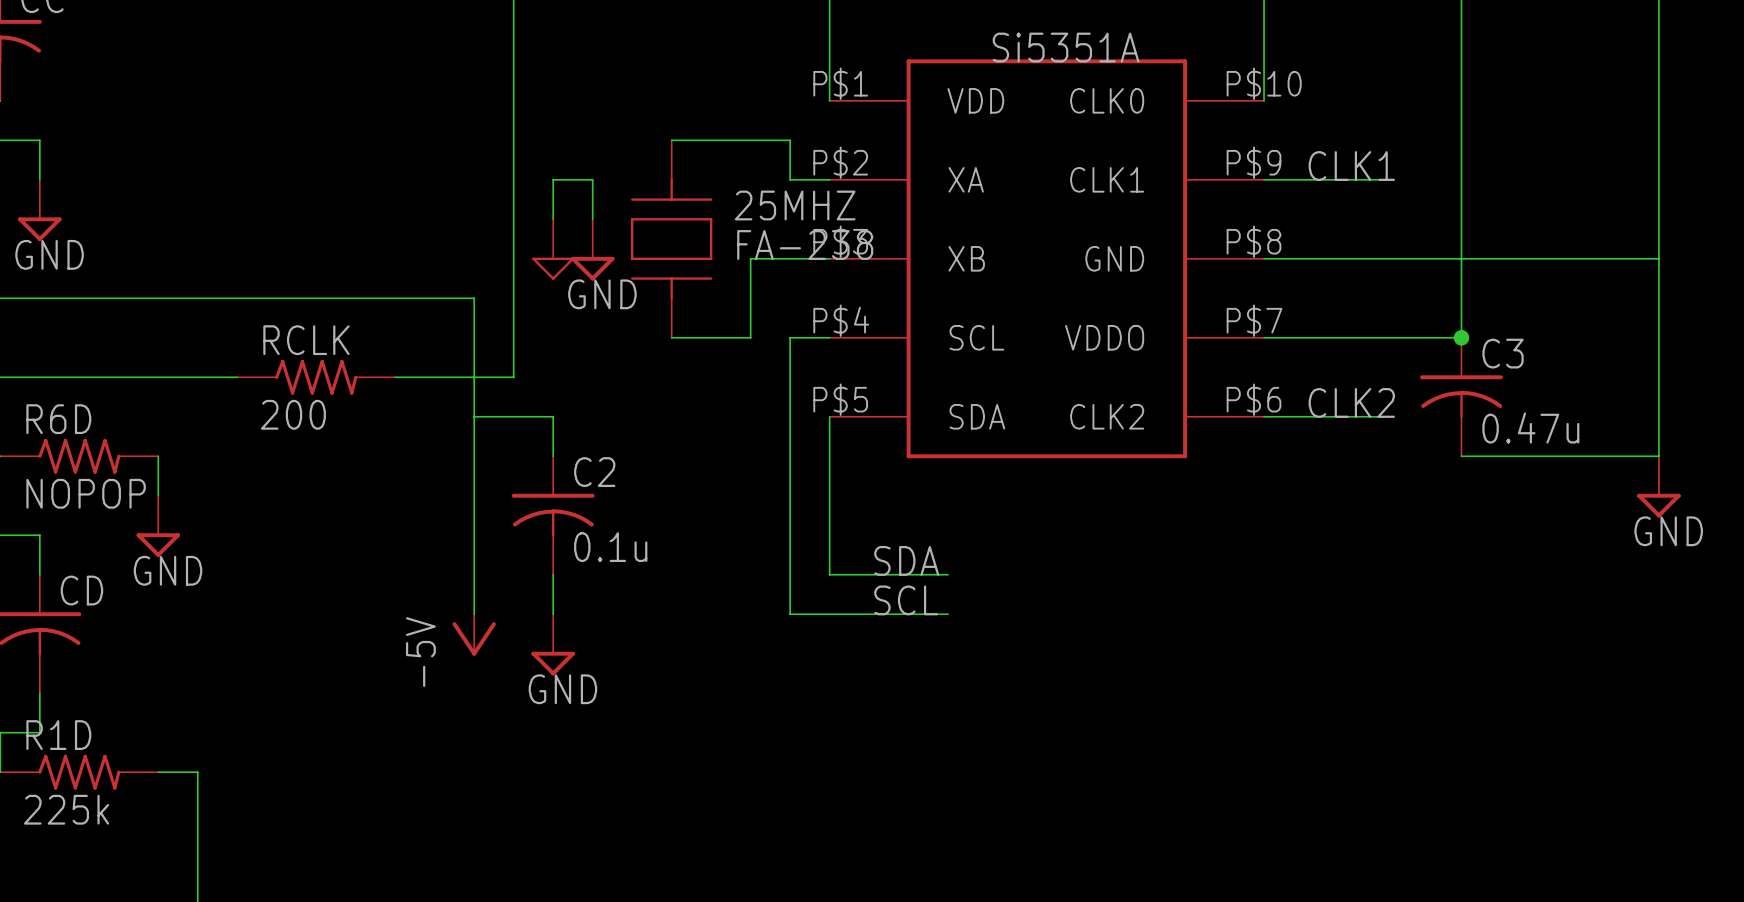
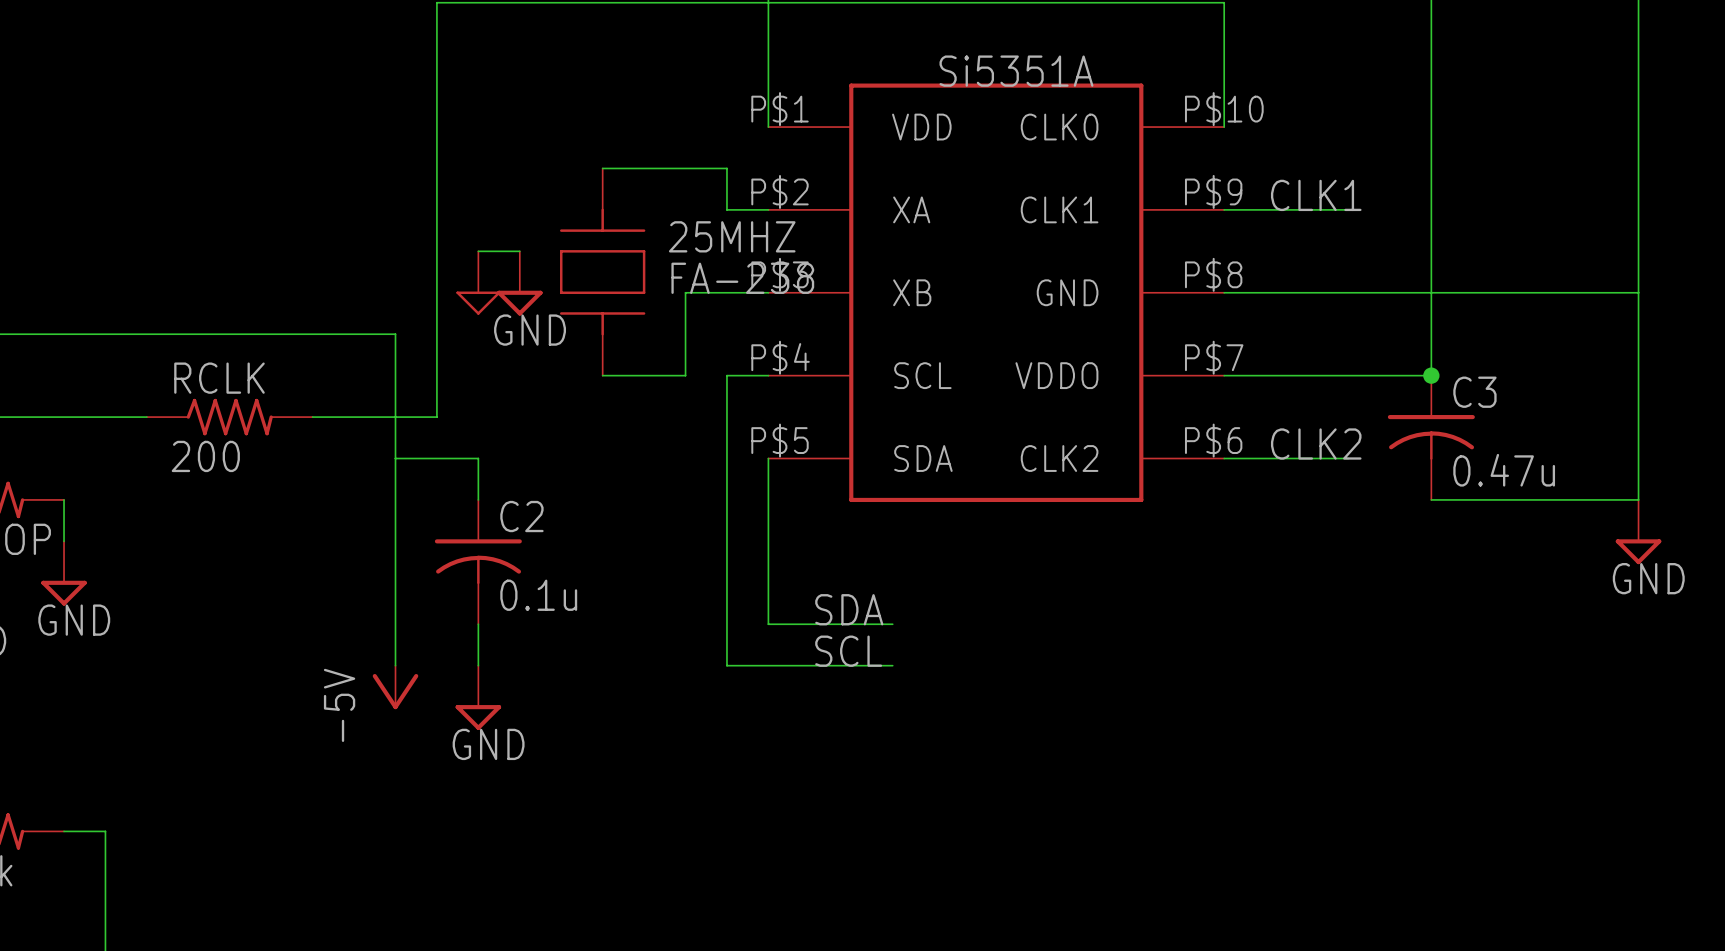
wire: (553, 219) (553, 179) (592, 179) (592, 219) -> (478, 251) (519, 251)

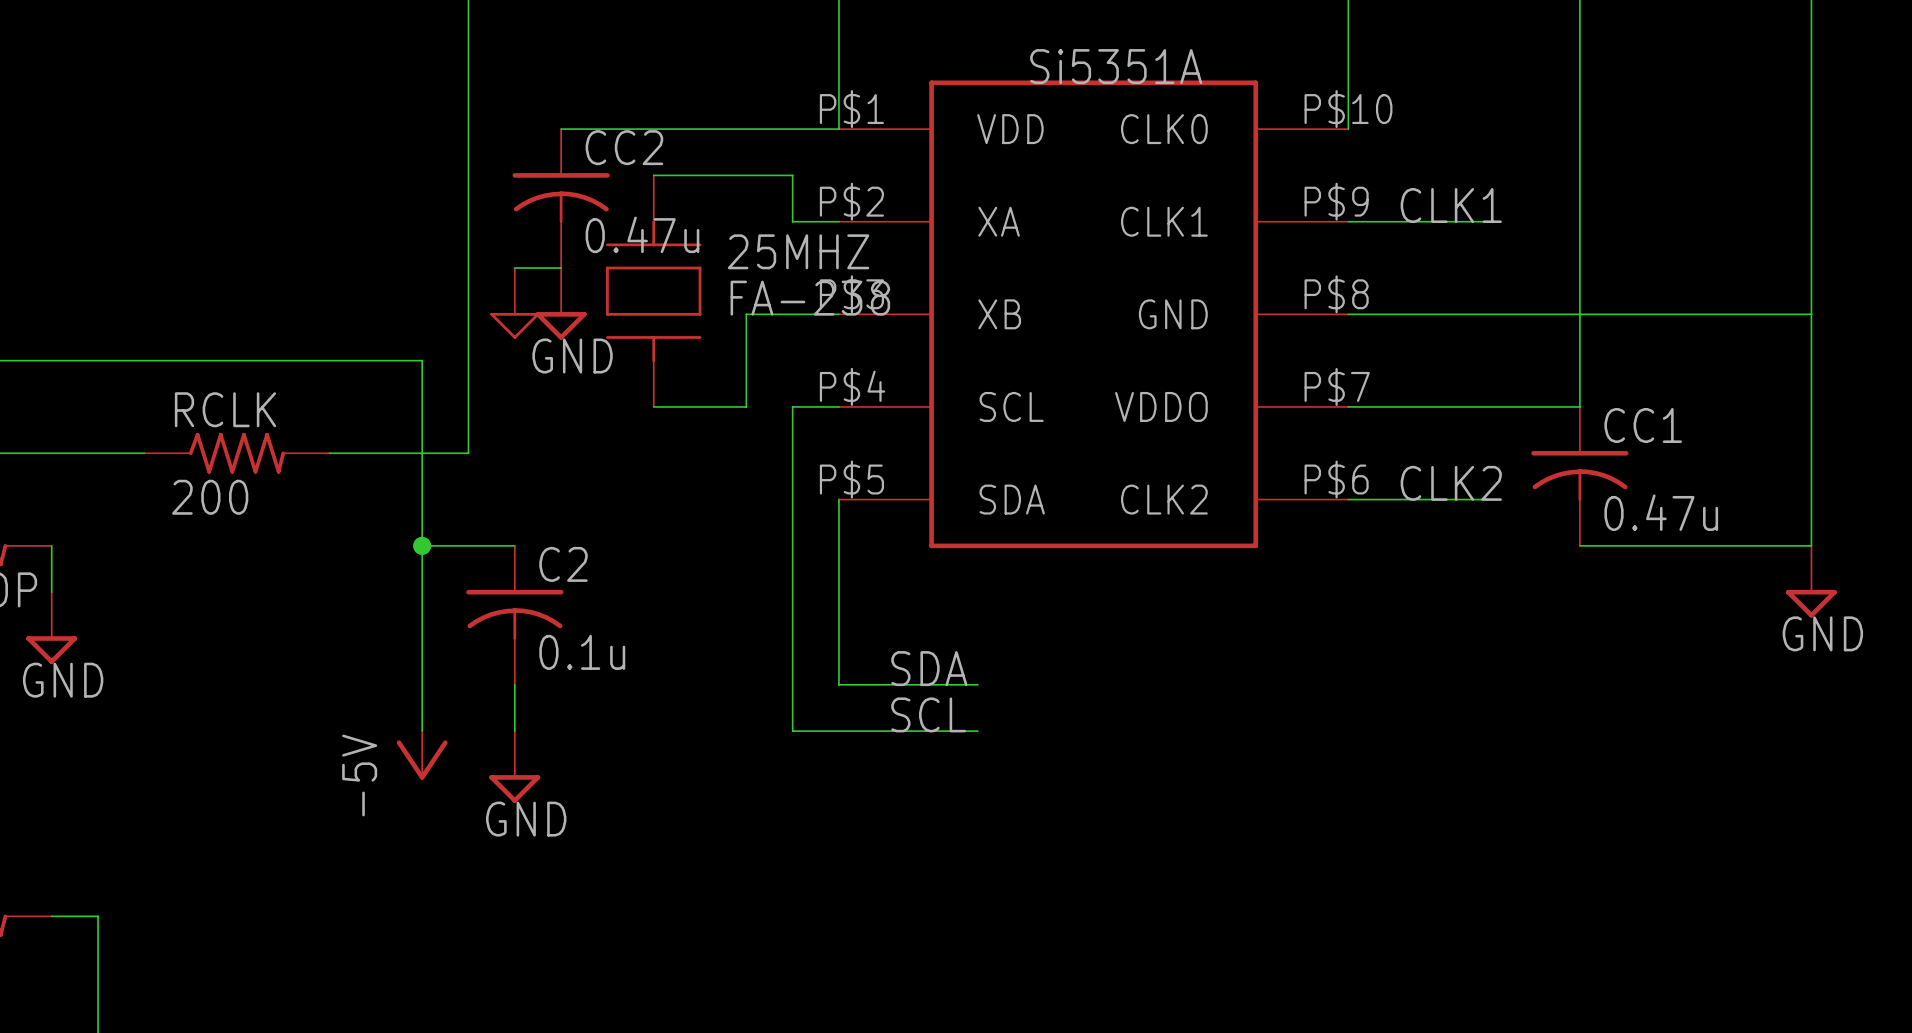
wire: none -> (561, 129) (838, 129)
CC2: none -> 0.47u (561, 198)
junction: (1431, 375) -> none
C3 name: C3 (1474, 392) -> CC1 (1643, 425)
wire: (395, 458) (478, 458) (478, 499) -> (422, 545) (514, 545)
junction: none -> (422, 545)

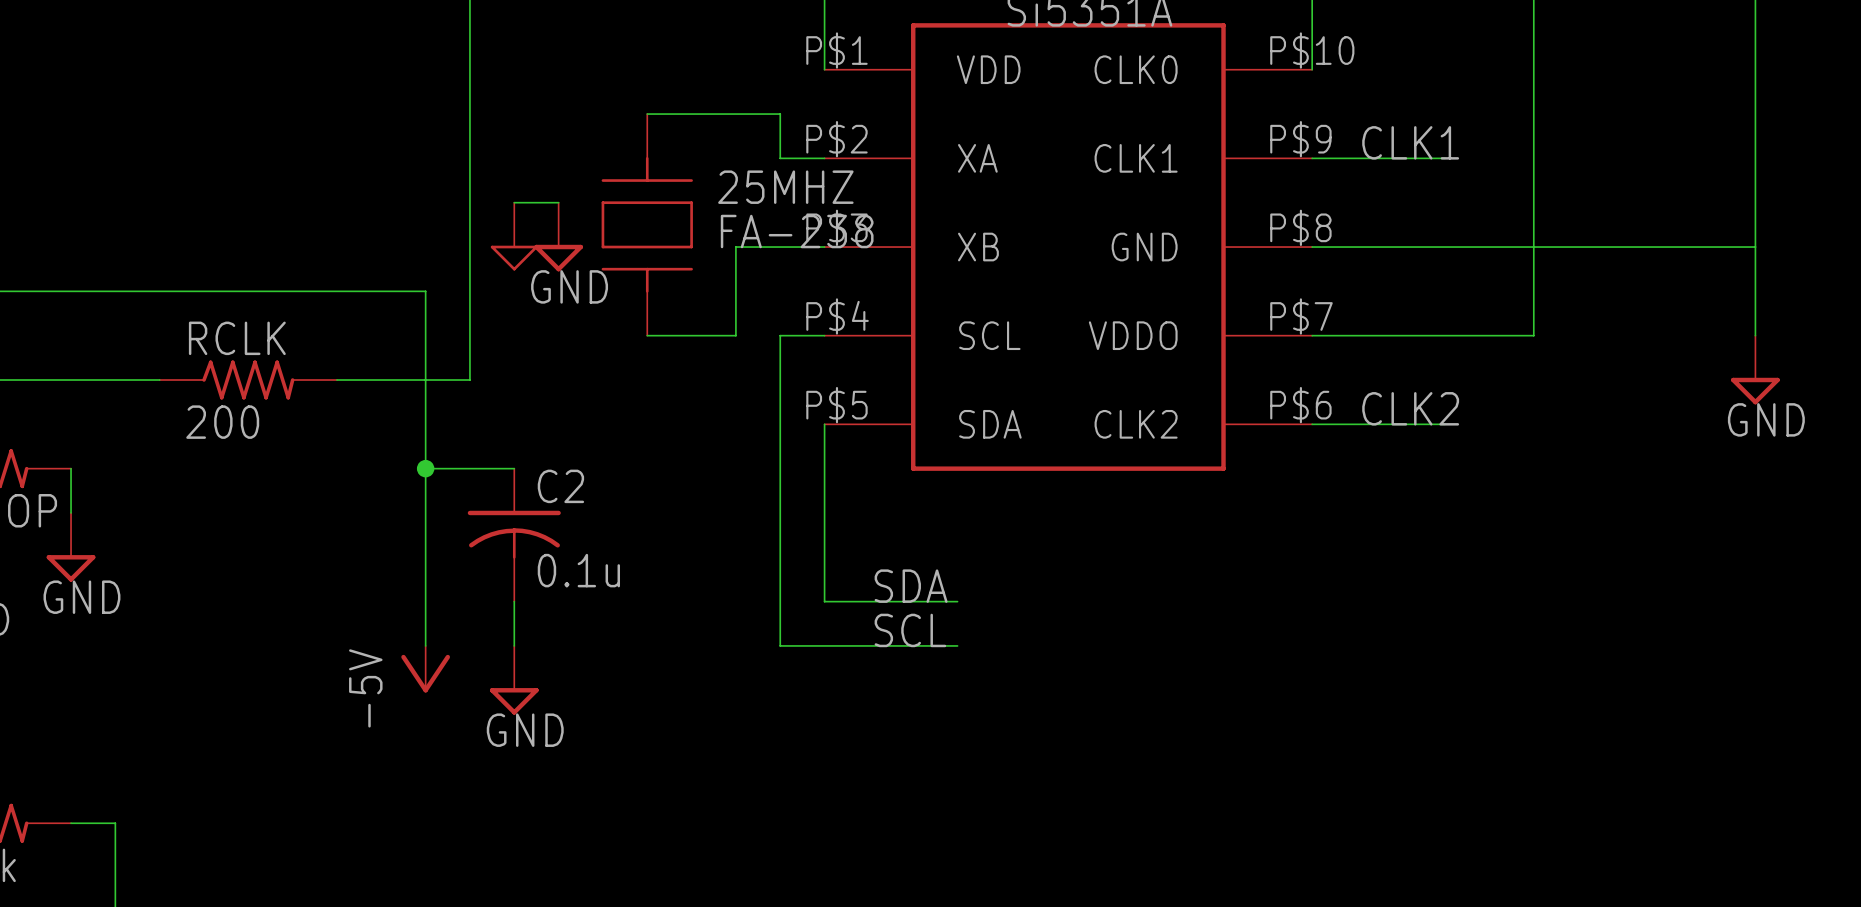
wire: (561, 129) (838, 129) -> none
CC2: 0.47u (561, 198) -> none
wire: (1811, 406) (1811, 545) (1579, 545) -> none
CC1: 0.47u (1579, 476) -> none
power symbol position: GND (1811, 581) -> GND (1755, 370)

